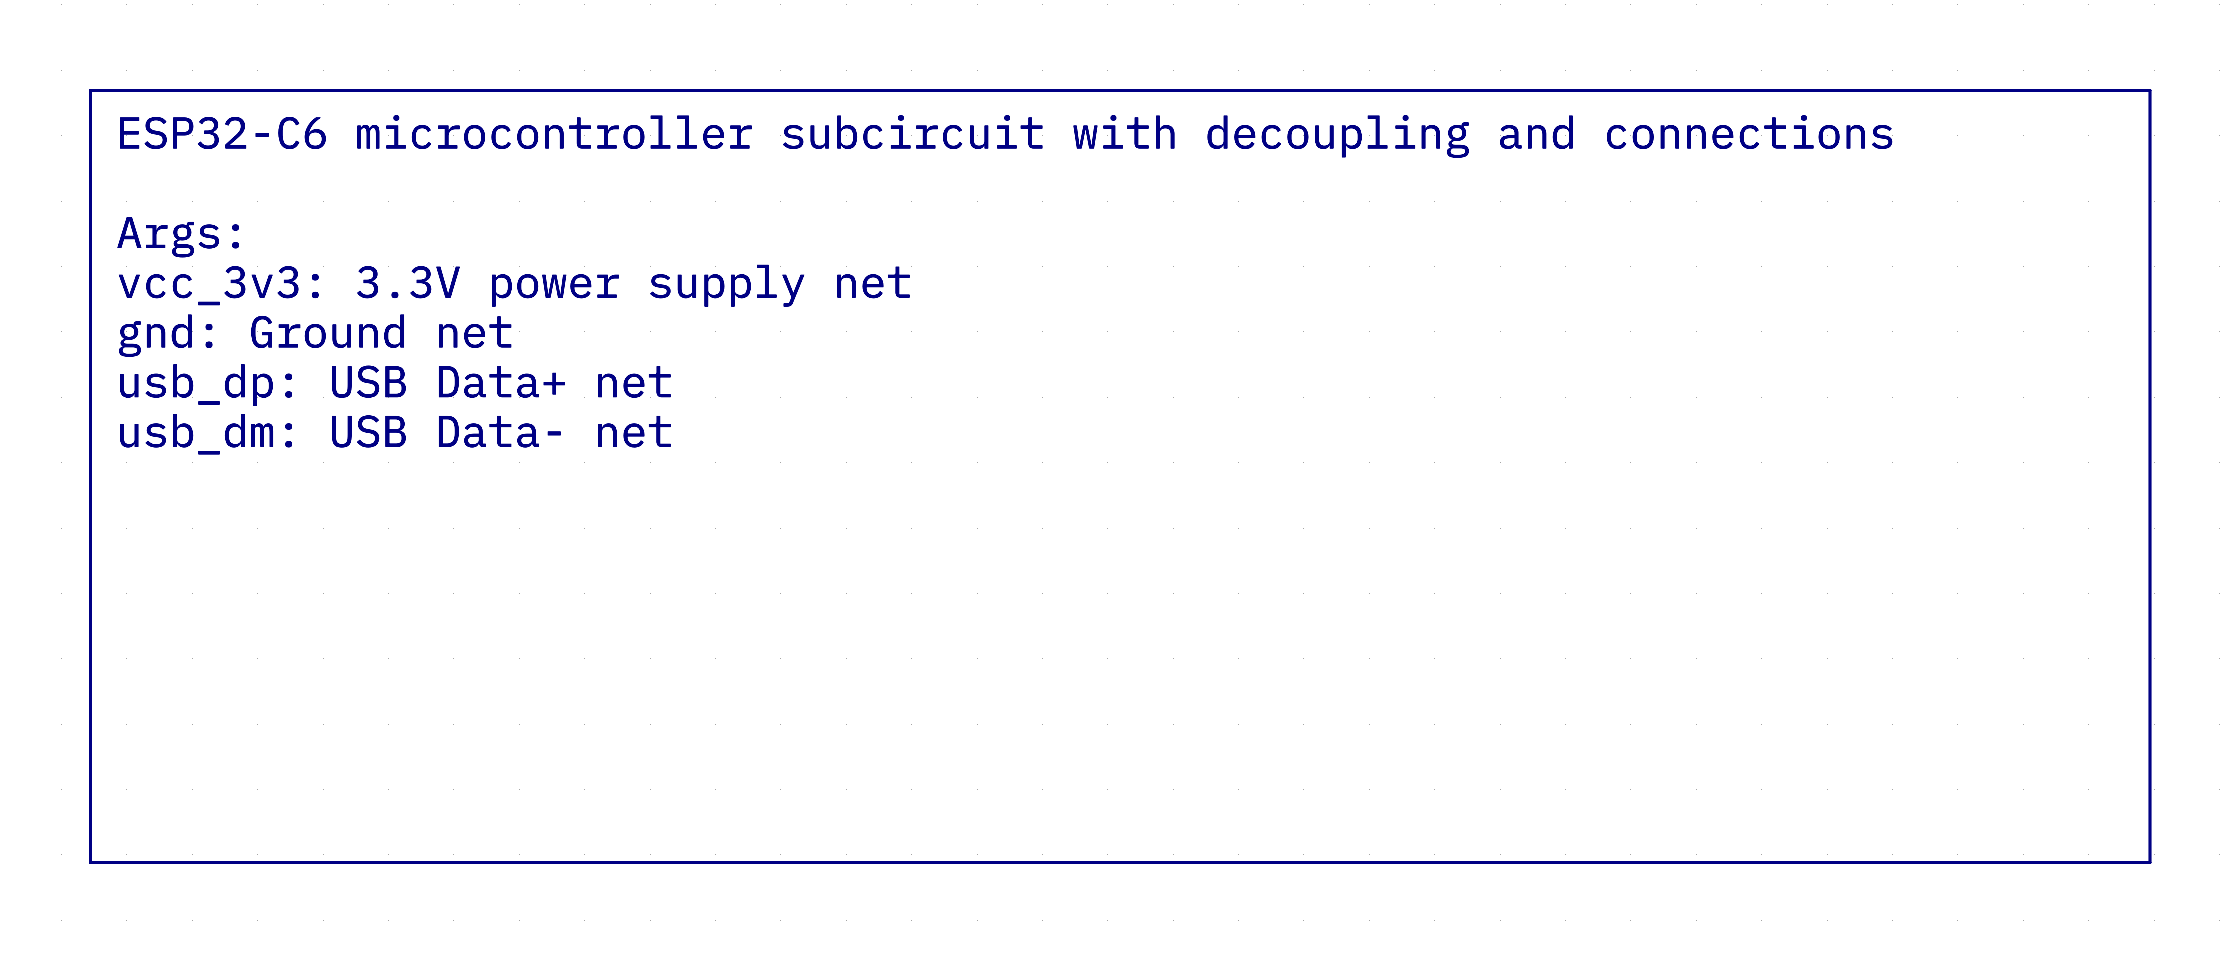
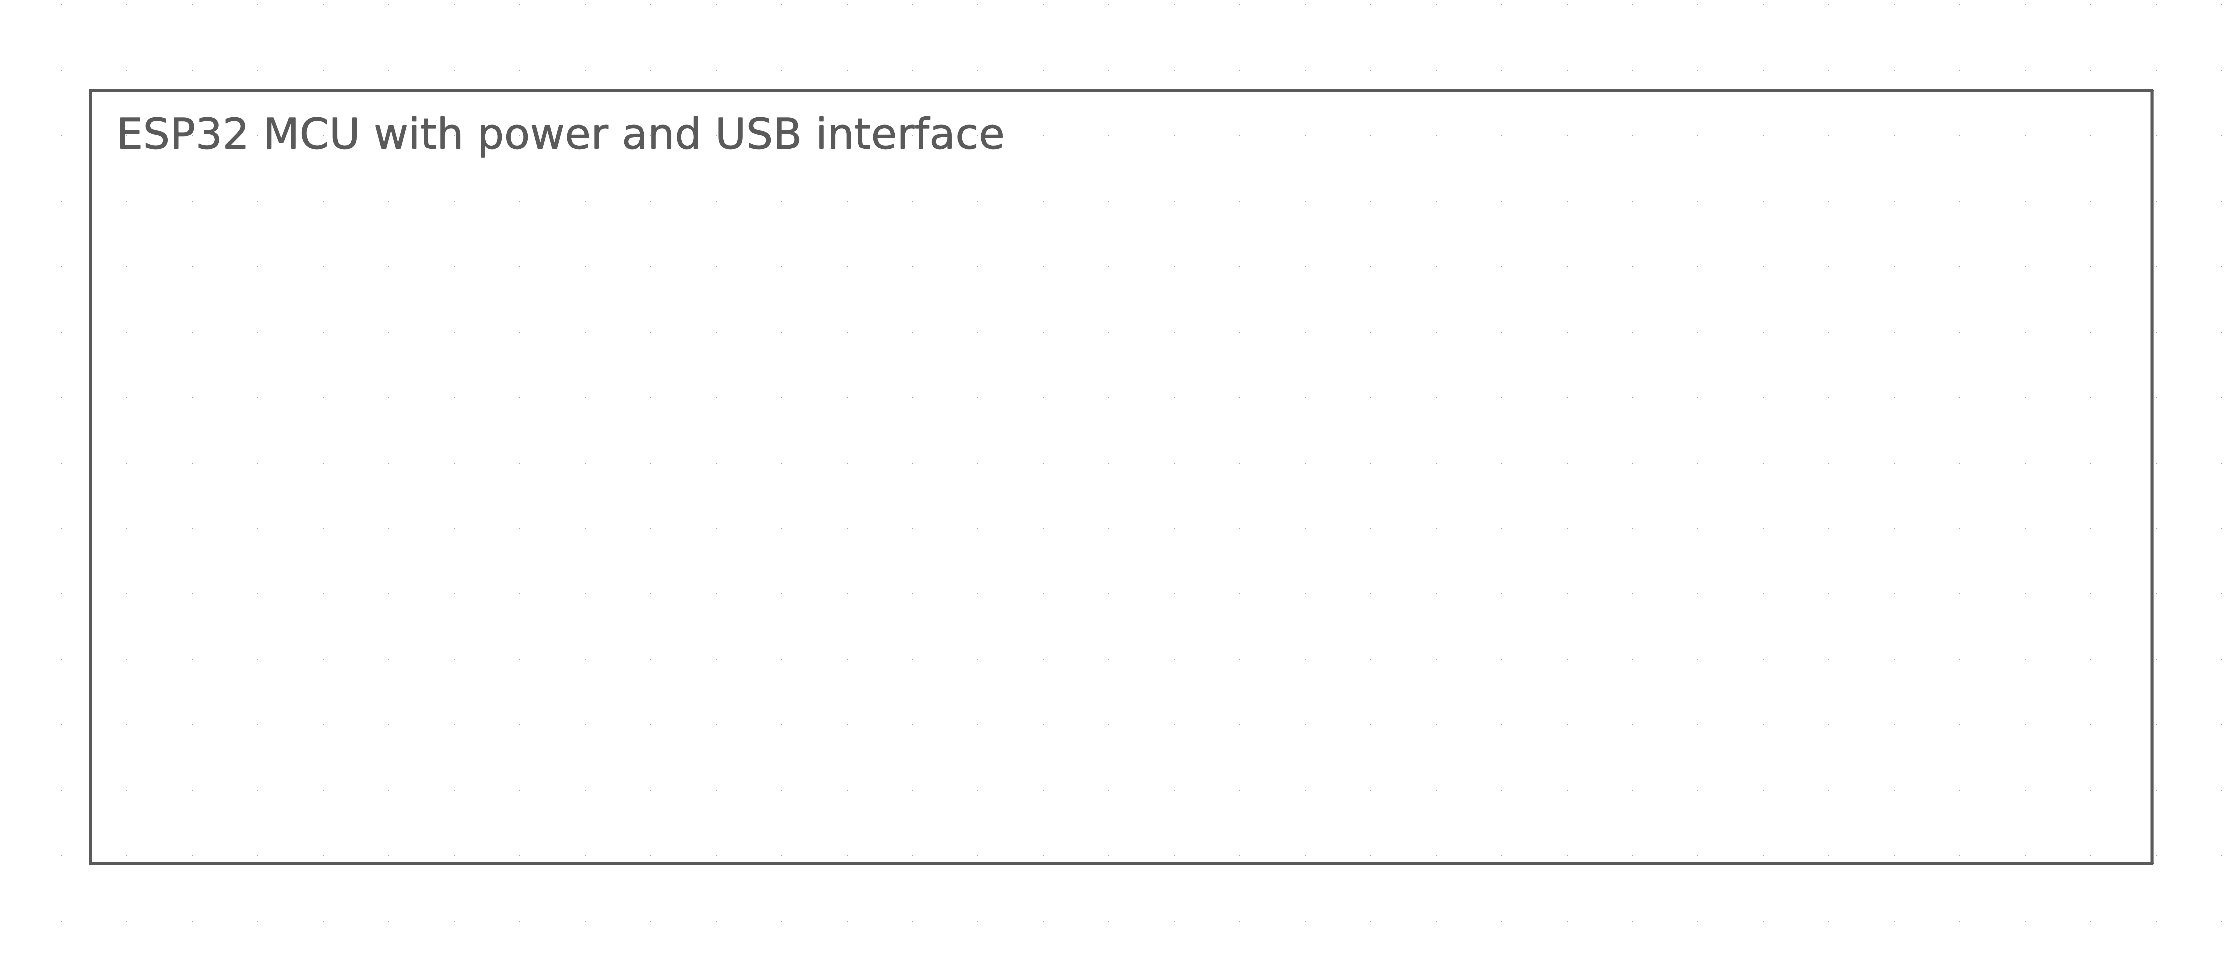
text: ESP32-C6 microcontroller subcircuit with decoupling and connections (1006, 136) -> ESP32 MCU with power and USB interface (561, 136)
text: Args: (178, 237) -> none
text: vcc_3v3: 3.3V power supply net (514, 285) -> none
text: gnd: Ground net (315, 335) -> none
text: usb_dp: USB Data+ net (395, 385) -> none
text: usb_dm: USB Data- net (395, 434) -> none

